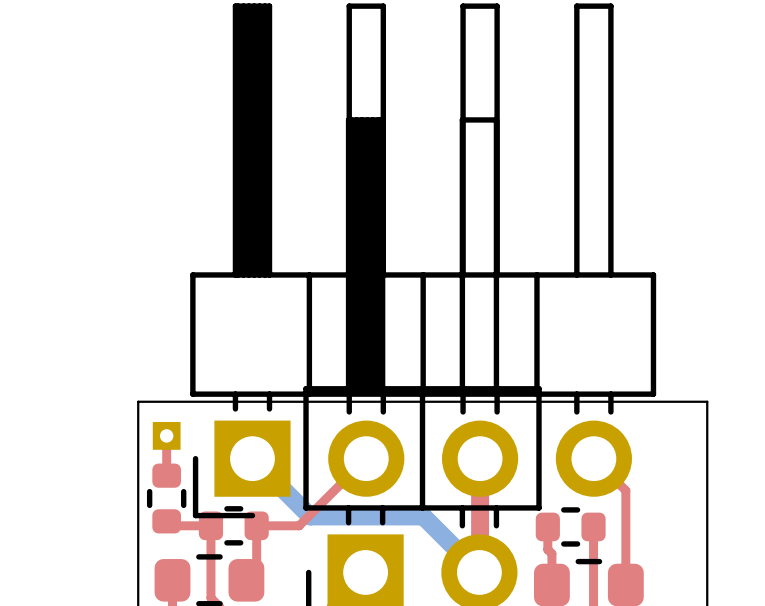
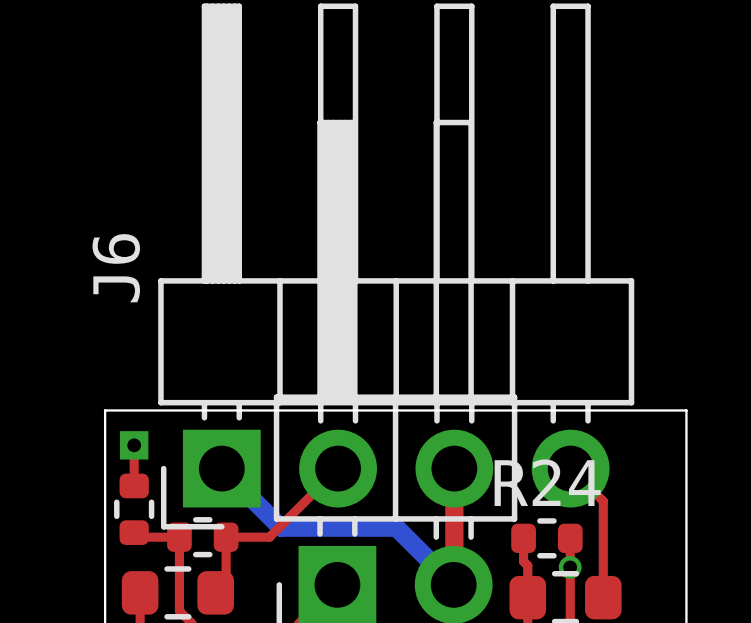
J6 name: none -> J6 (116, 268)
R24 name: none -> R24 (547, 482)
via: none -> (570, 567)

